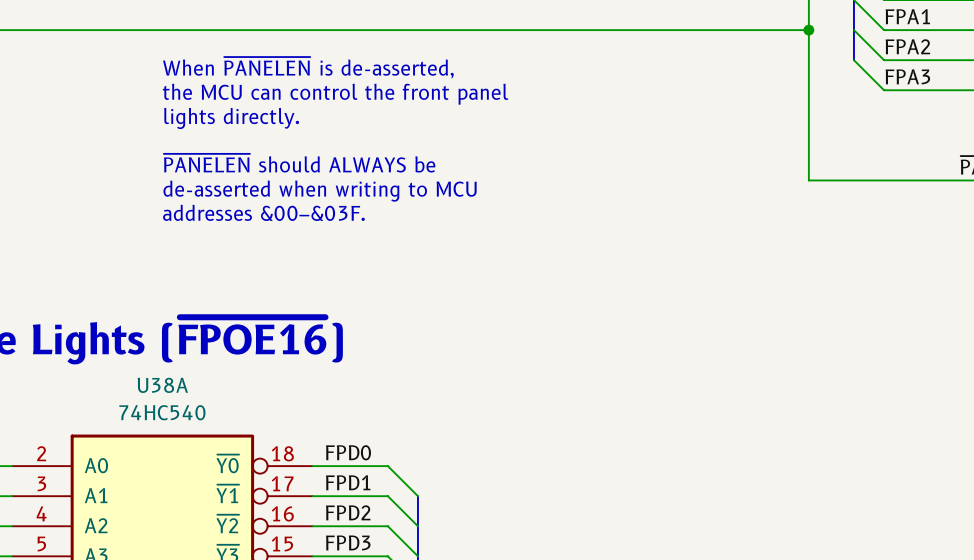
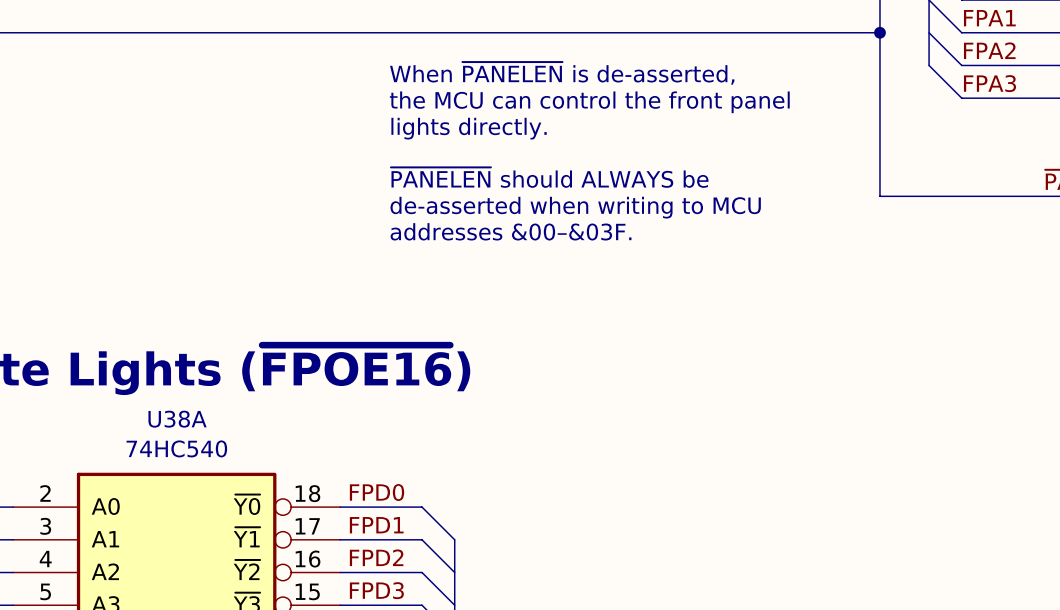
text position: When ~{PANELEN} is de-asserted, (308, 67) -> When ~{PANELEN} is de-asserted, (562, 73)
text position: the MCU can control the front panel (335, 94) -> the MCU can control the front panel (589, 102)
text position: lights directly. (231, 118) -> lights directly. (469, 128)
text position: ~{PANELEN} should ALWAYS be (299, 163) -> ~{PANELEN} should ALWAYS be (549, 177)
text position: de-asserted when writing to MCU (320, 191) -> de-asserted when writing to MCU (575, 207)
text position: addresses &00–&03F. (263, 212) -> addresses &00–&03F. (511, 231)

